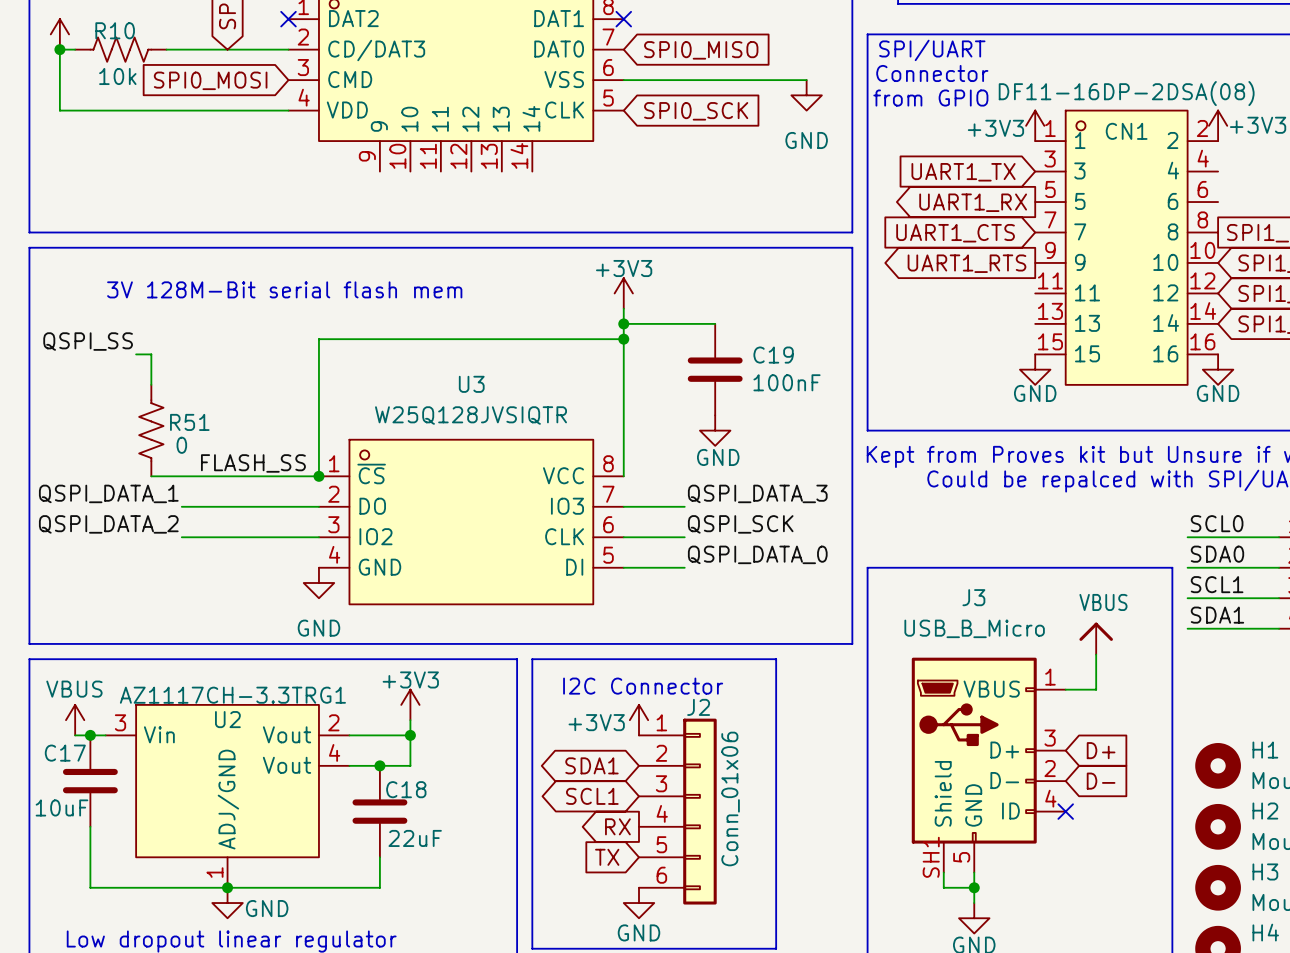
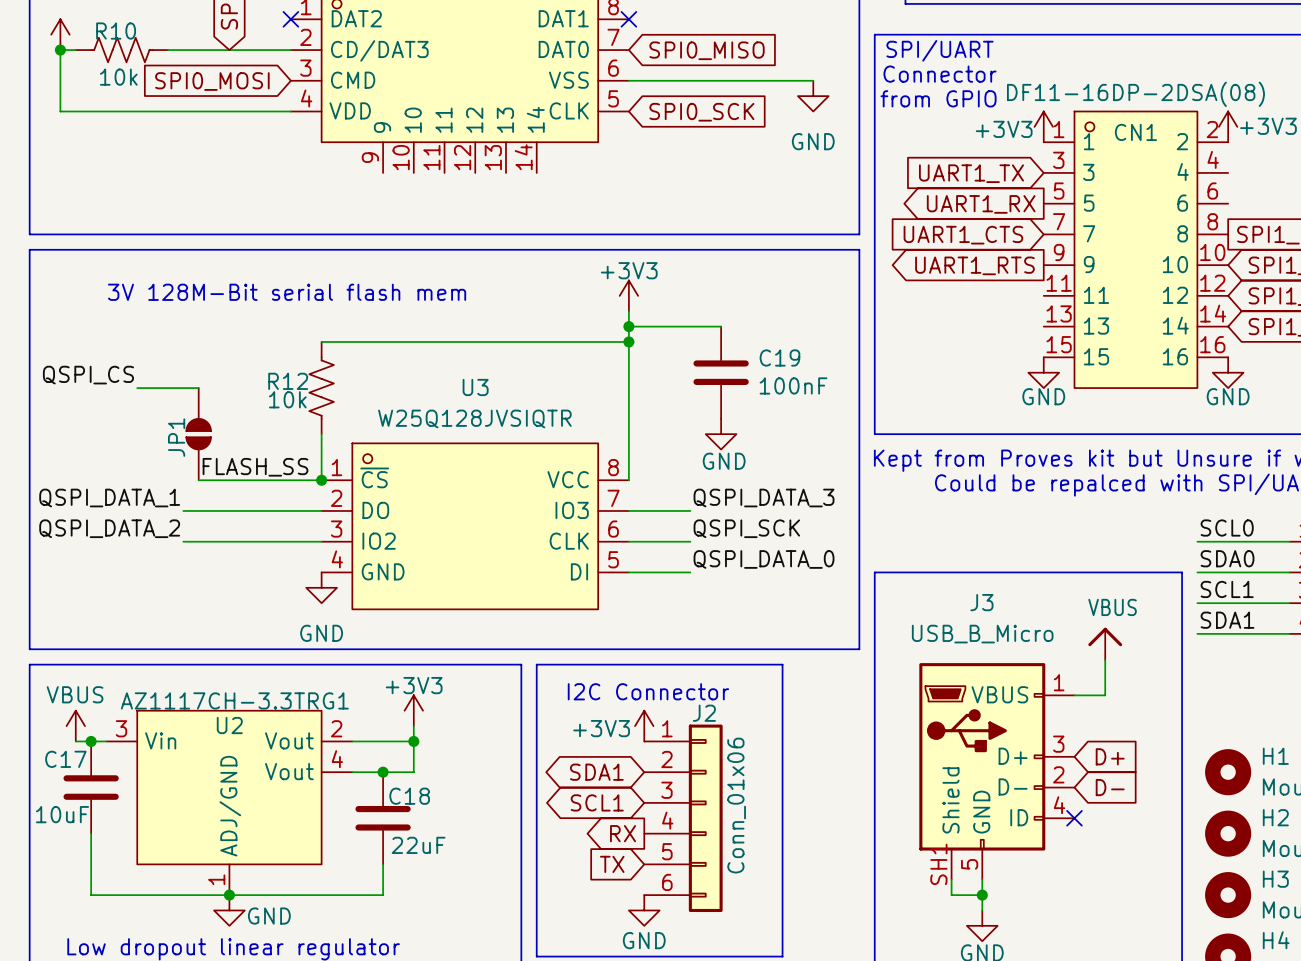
label: QSPI_SS (88, 341) -> QSPI_CS (88, 375)
wire: (136, 354) (151, 354) (151, 384) -> none
wire: none -> (137, 388) (198, 388)
R12: none -> 10k (321, 388)
R51: 0 (151, 430) -> none
JP1: none -> (198, 434)
wire: (151, 476) (197, 476) -> none

